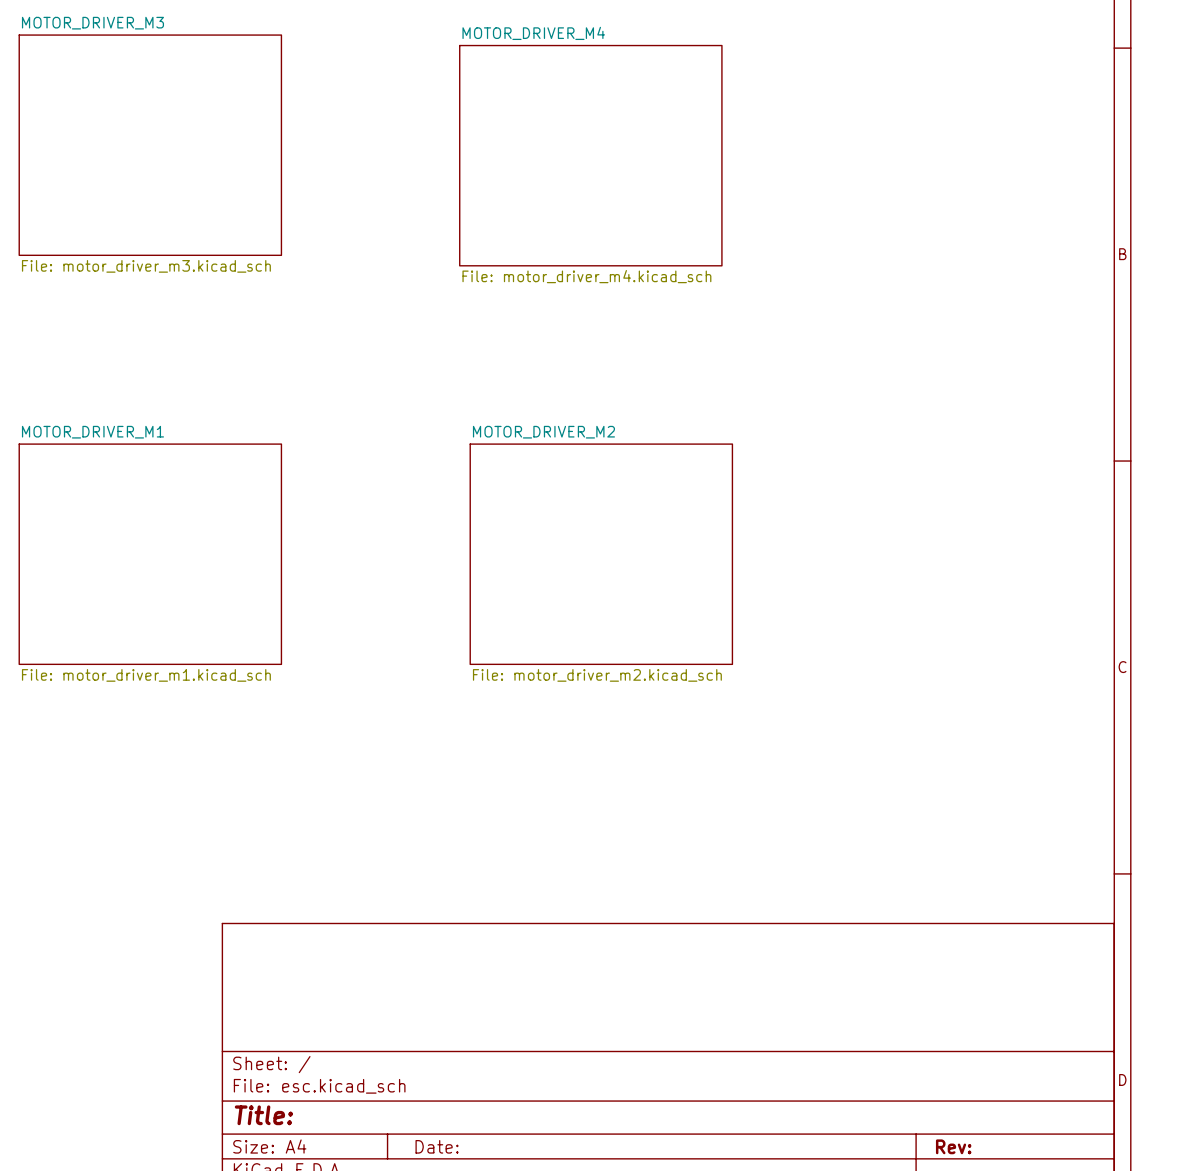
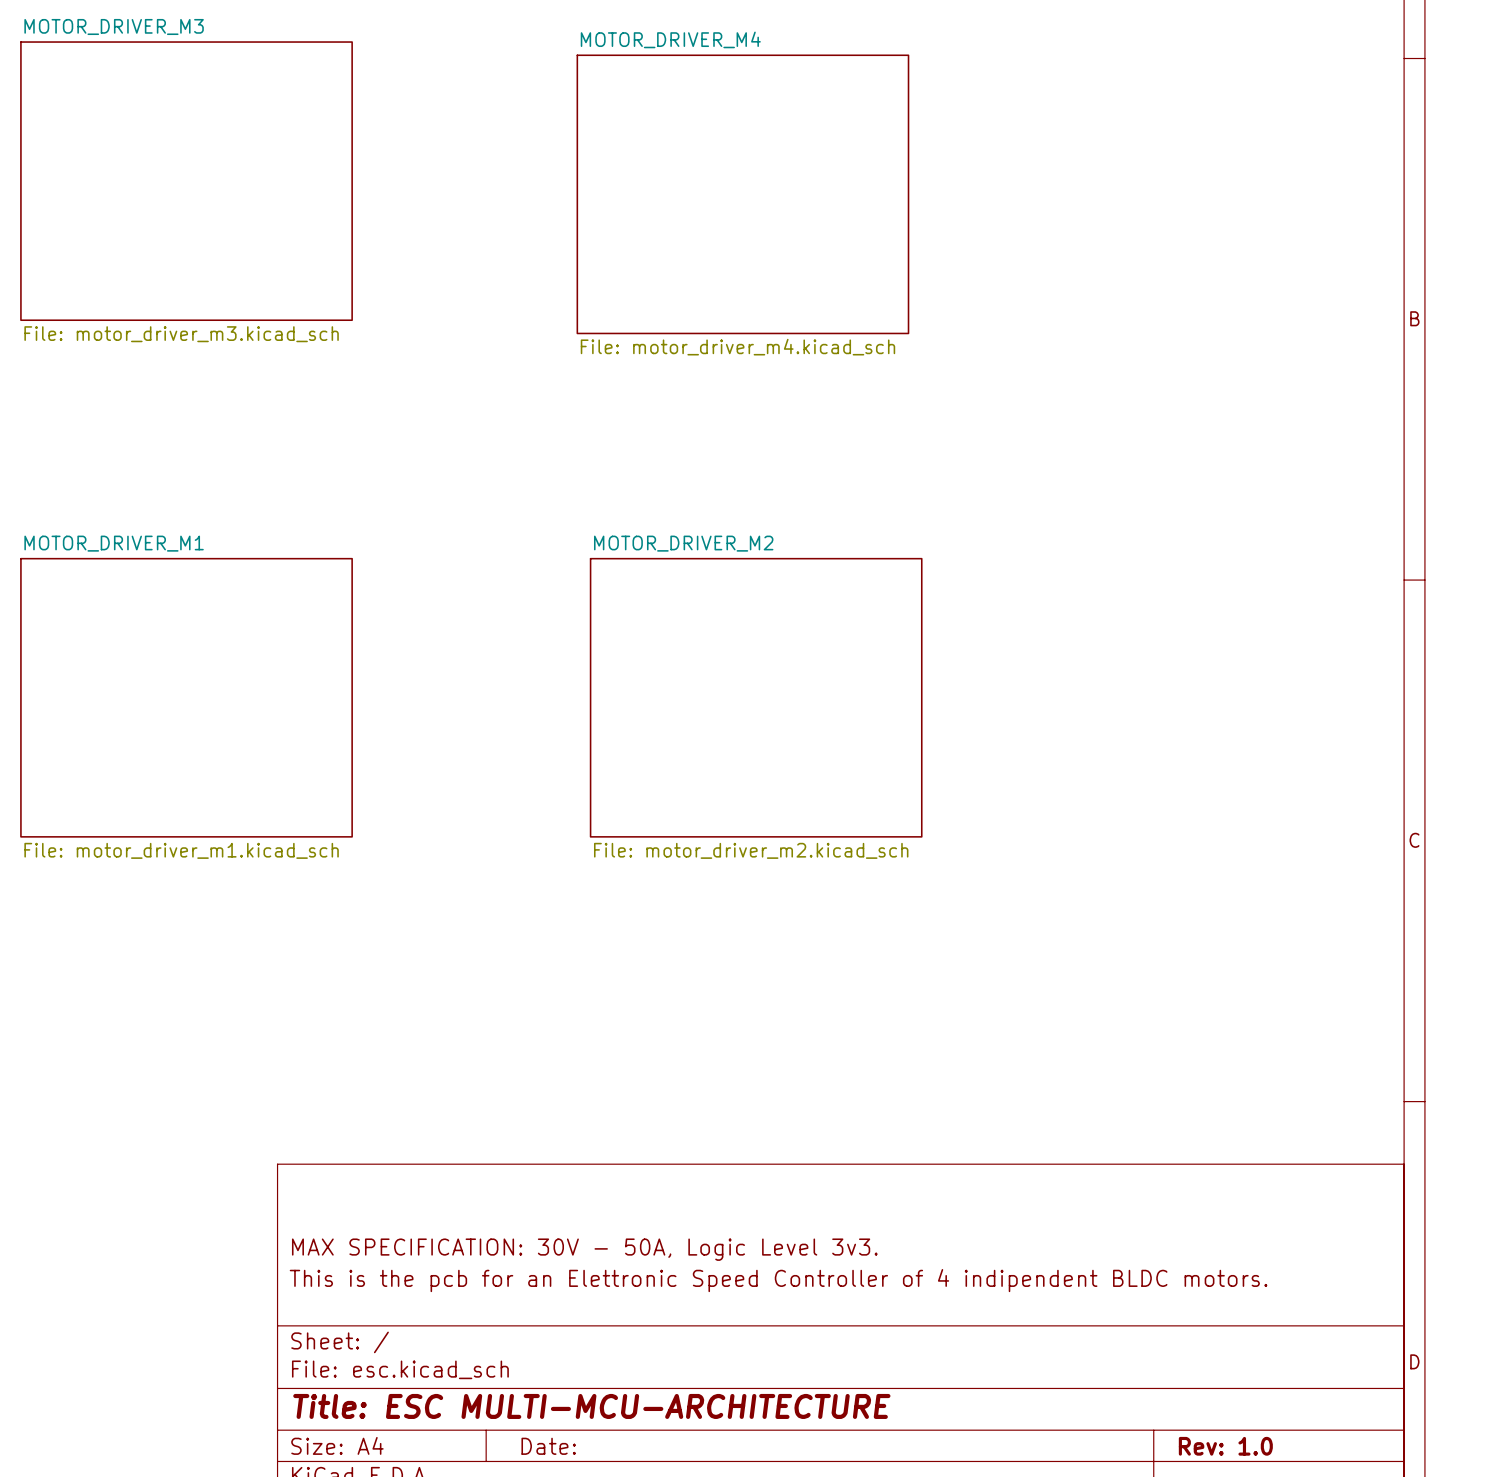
title block: none -> MAX SPECIFICATION: 30V - 50A, Logic Level 3v3. (584, 1249)
title block: none -> This is the pcb for an Elettronic Speed Controller of 4 indipendent BLDC motors. (778, 1280)
title block: Title: (263, 1115) -> Title: ESC MULTI-MCU-ARCHITECTURE (591, 1406)
title block: Rev: (953, 1146) -> Rev: 1.0 (1225, 1446)

